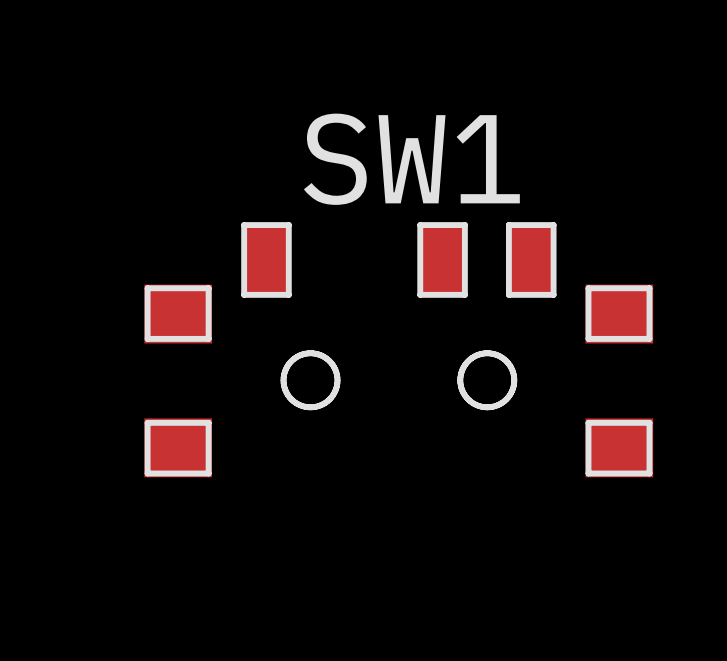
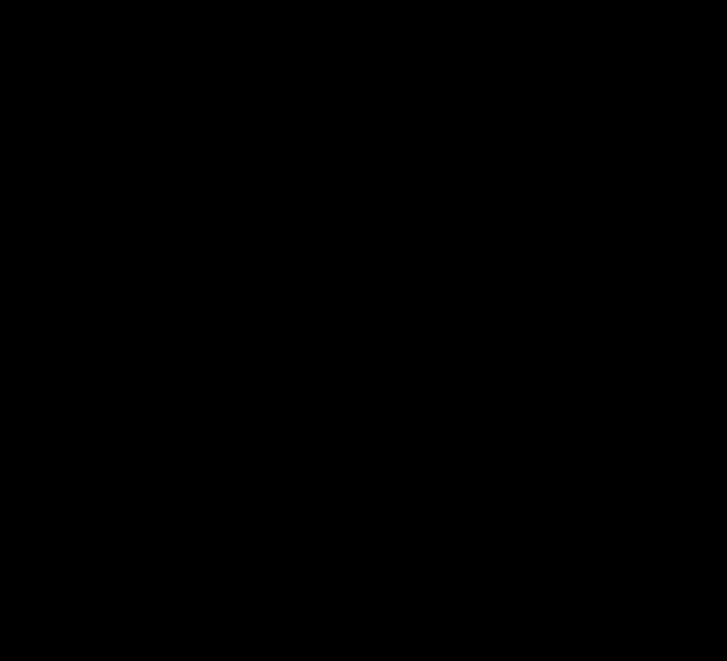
SW1: (398, 349) -> none

